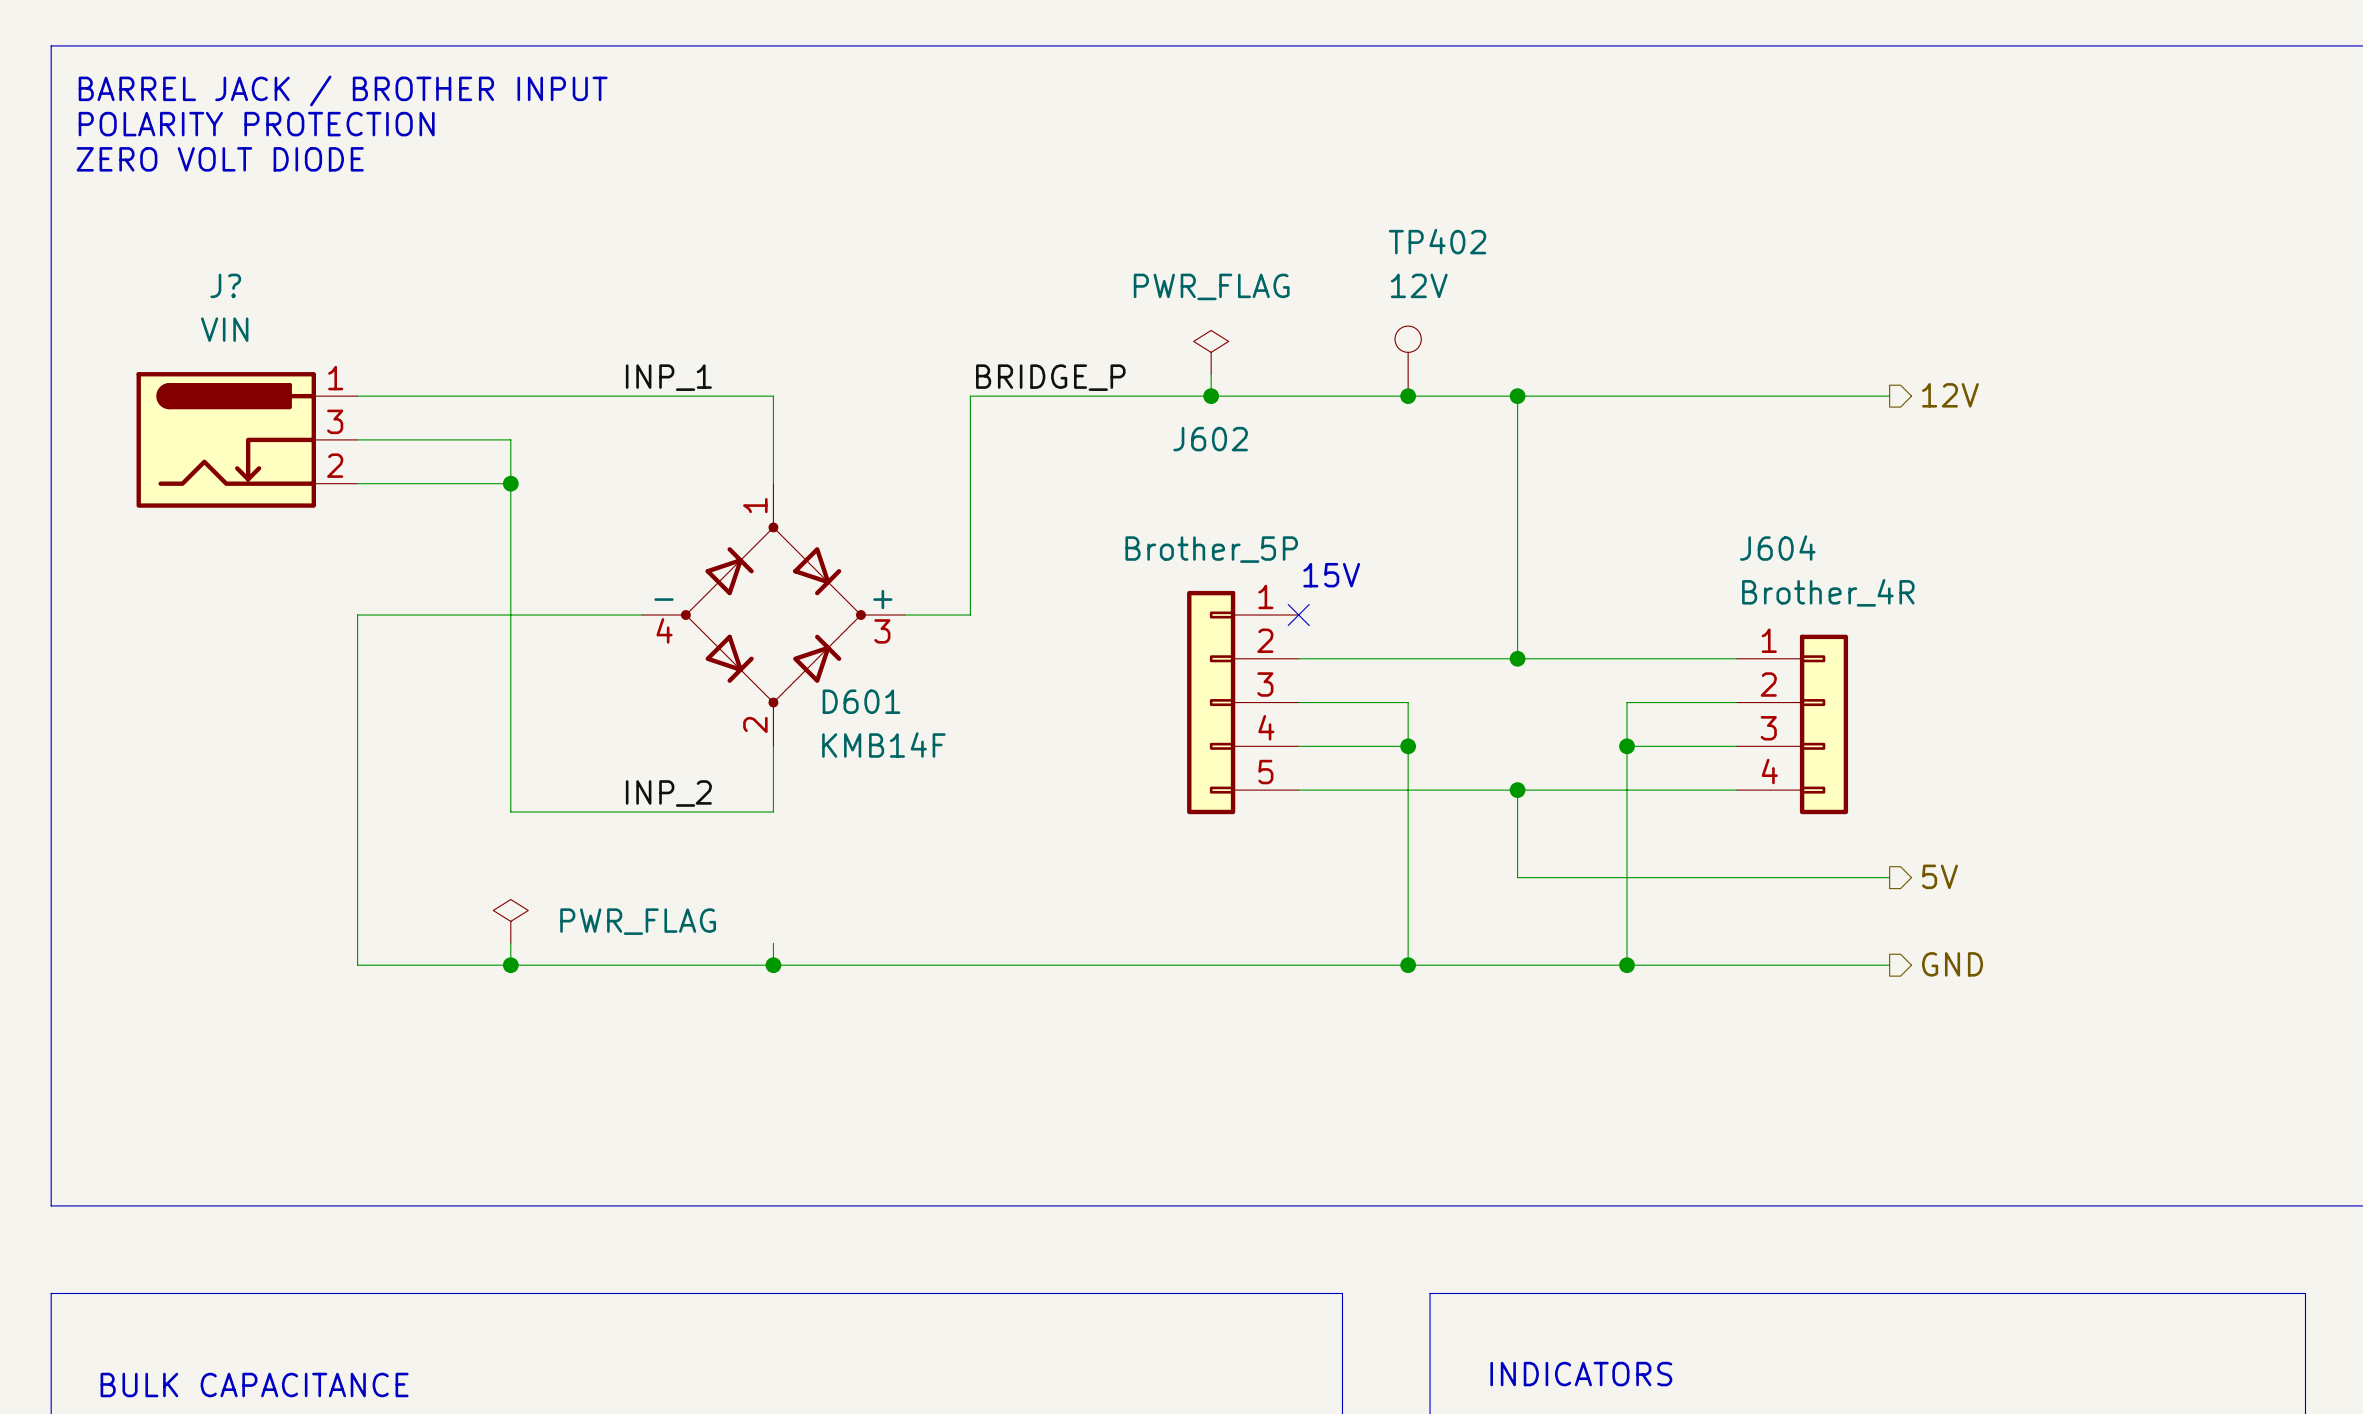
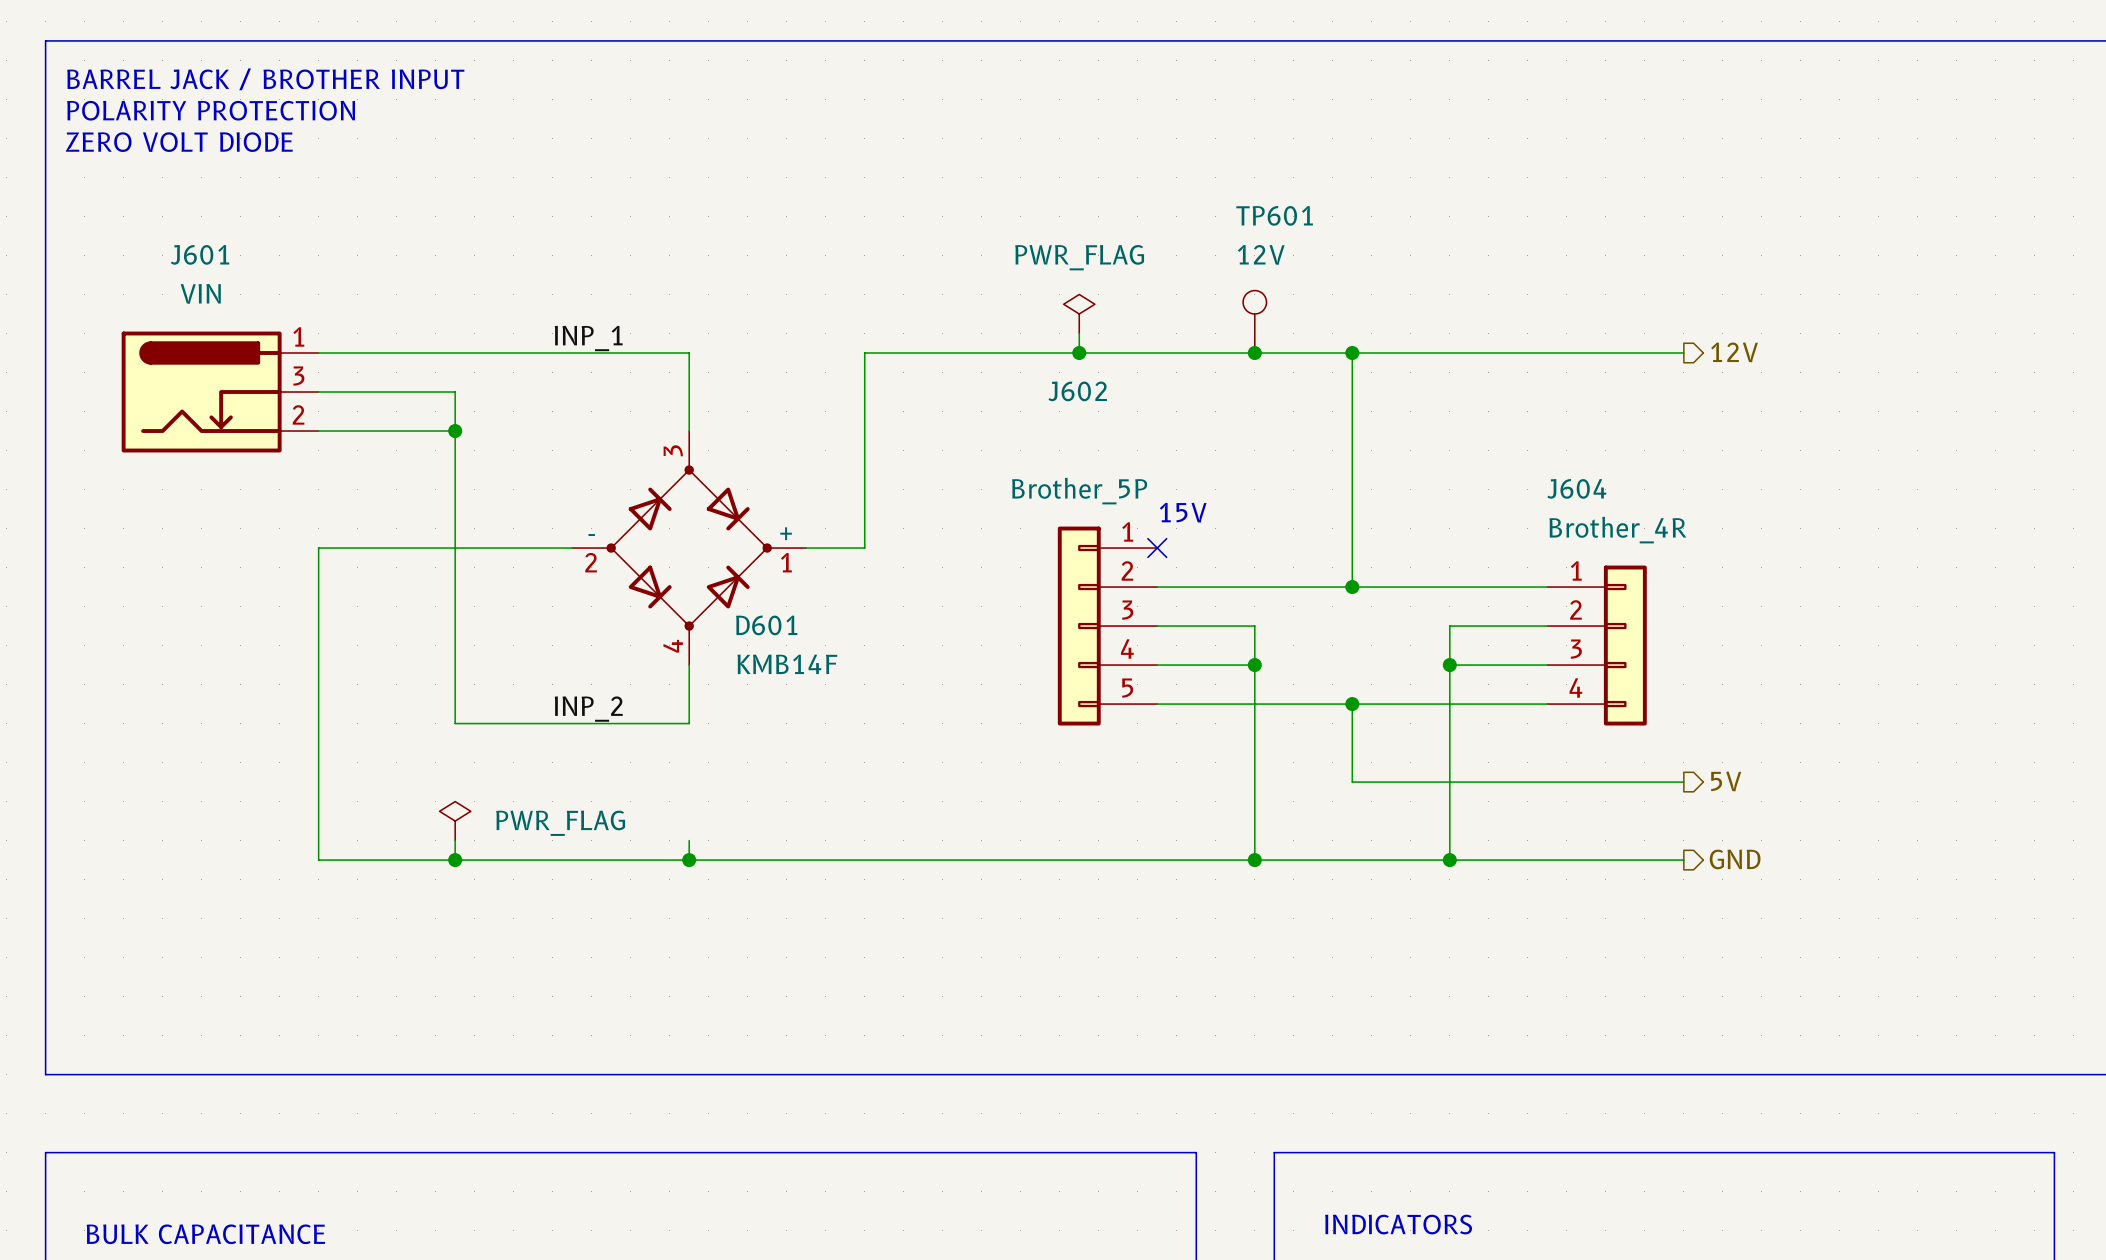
TP402 name: TP402 (1437, 241) -> TP601 (1274, 215)
J? name: J? (225, 285) -> J601 (200, 254)
label: BRIDGE_P (1050, 377) -> none
D601 pin number: 1 (755, 505) -> 3 (673, 450)
D601 pin number: 4 (664, 630) -> 2 (591, 562)
D601 pin number: 3 (882, 631) -> 1 (786, 562)
D601 pin number: 2 (755, 724) -> 4 (673, 646)

